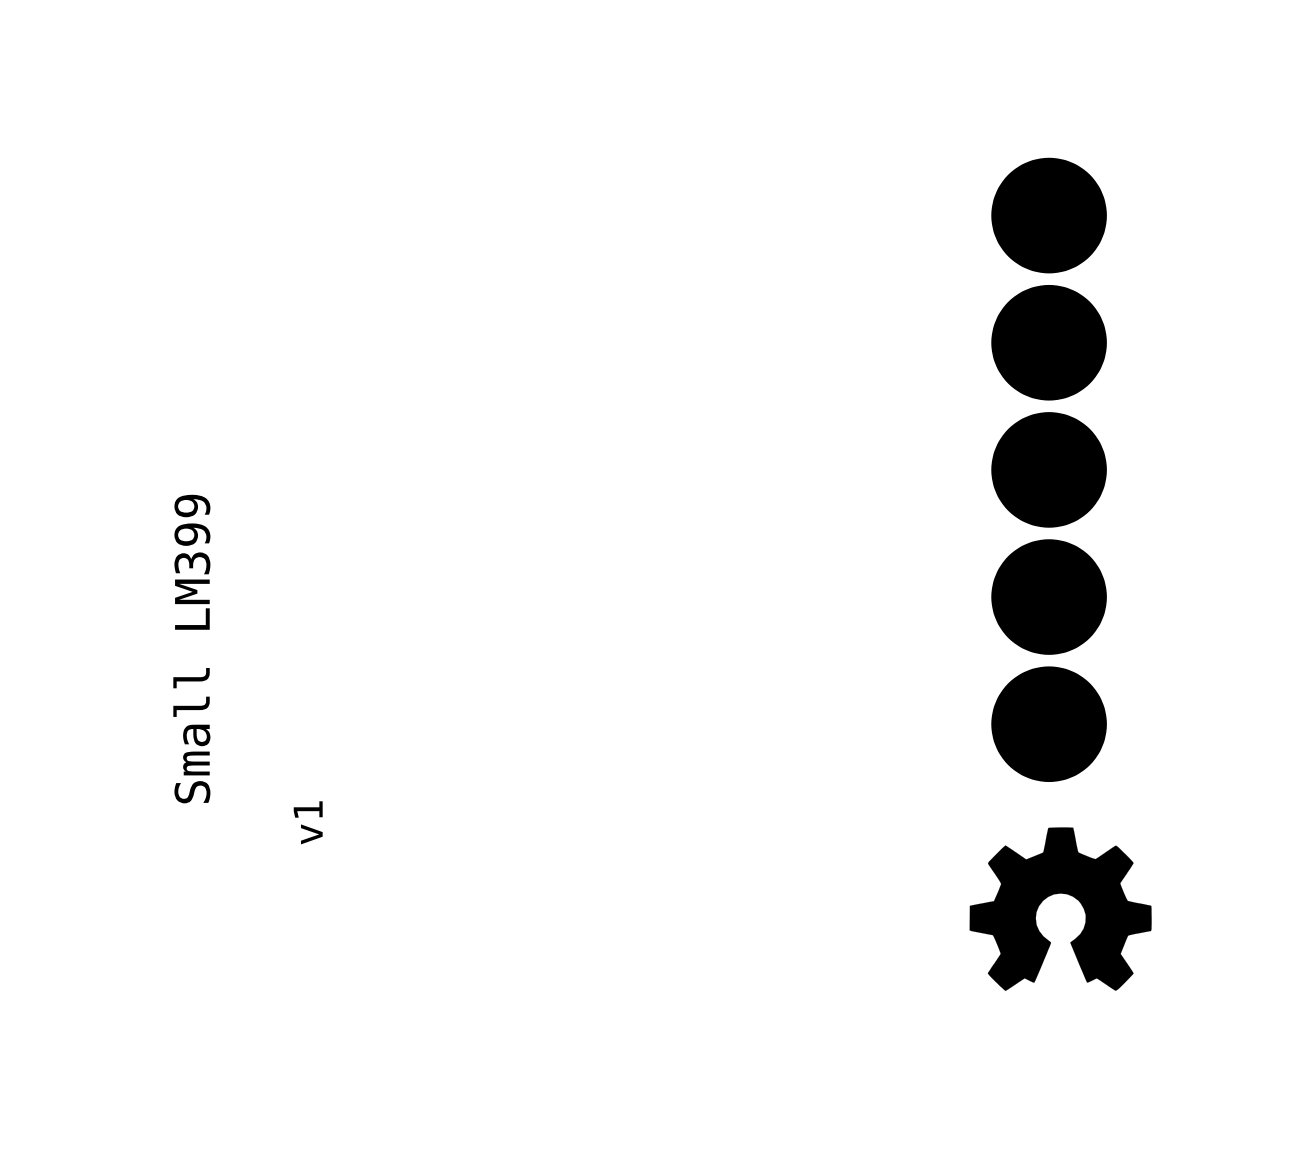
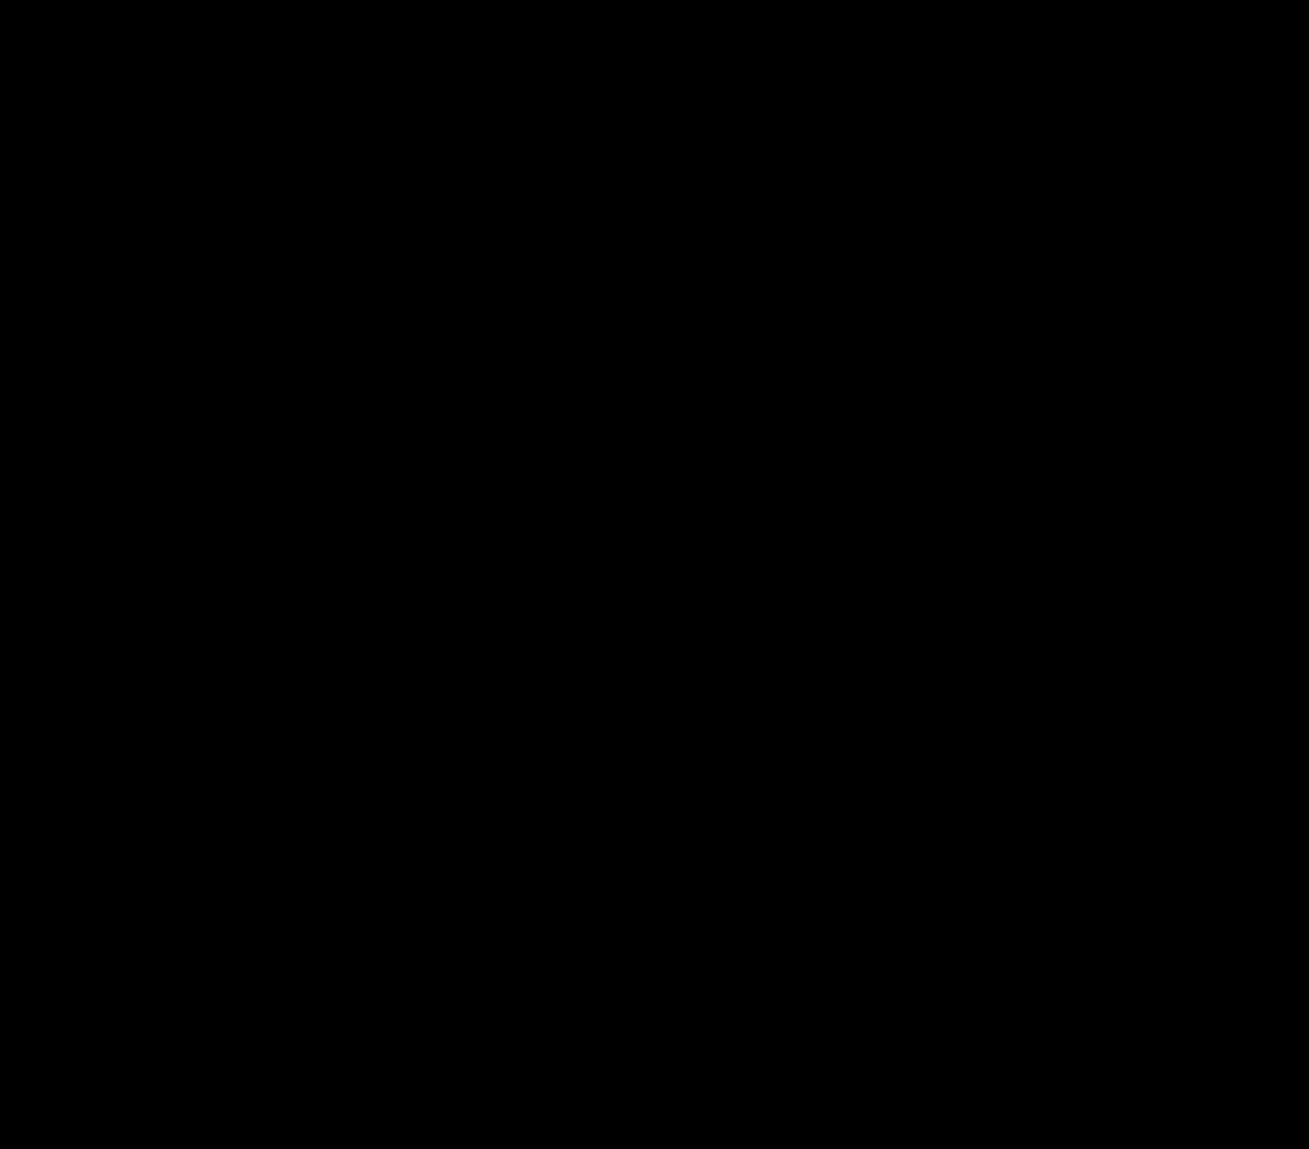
drawing: [969, 157, 1152, 991] -> none
text: Small LM399 (191, 649) -> none
text: v1 (308, 822) -> none

